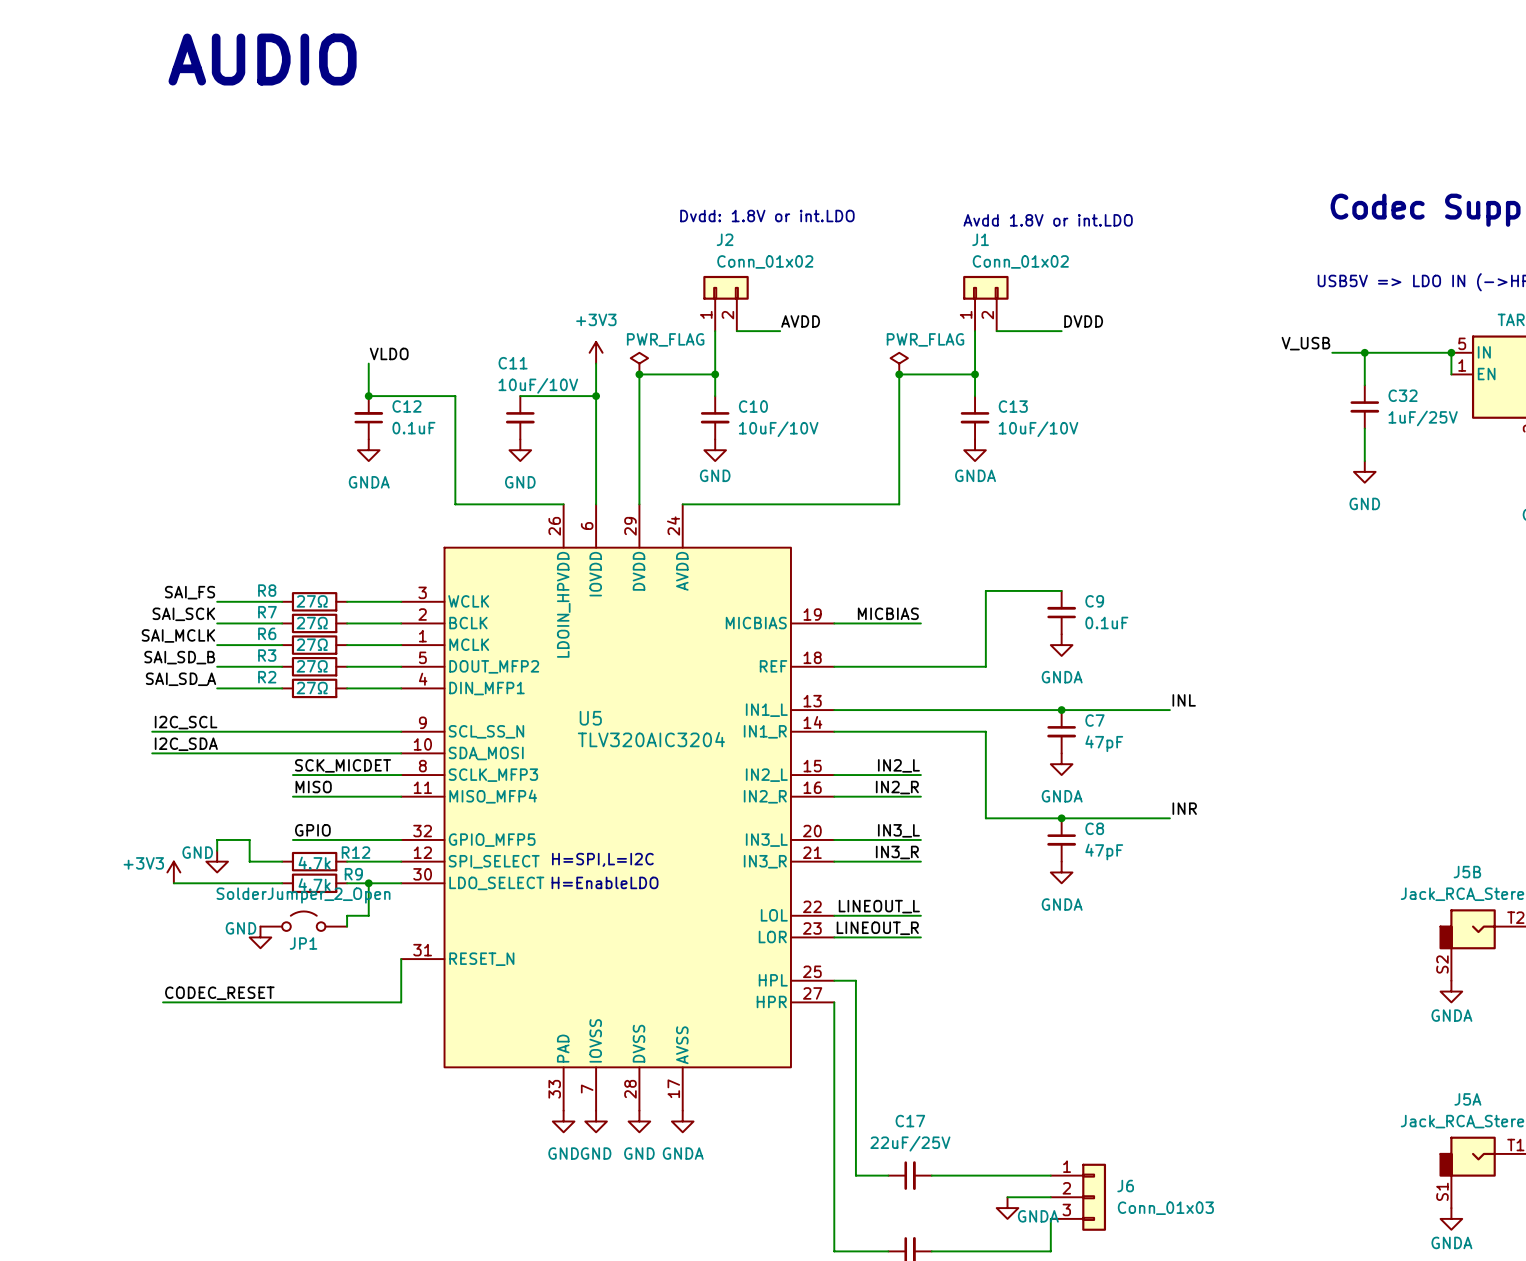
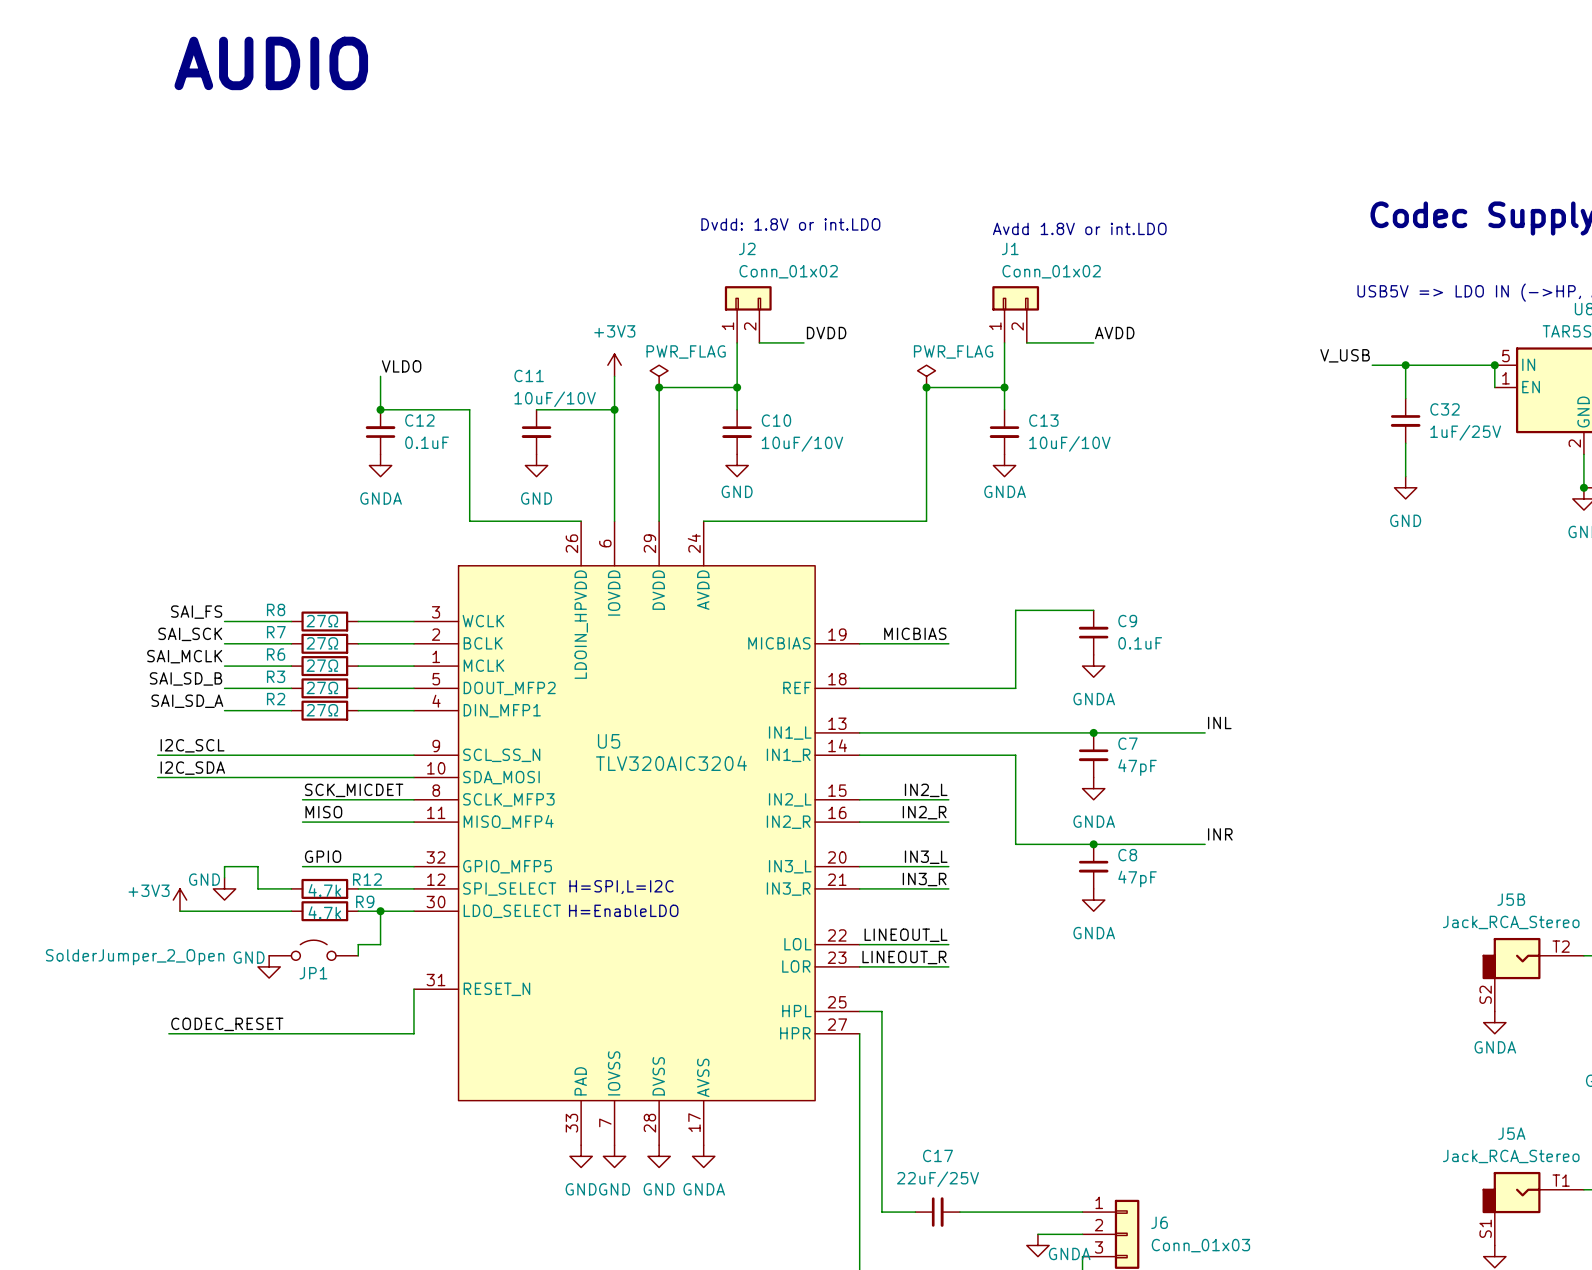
label: AVDD (800, 321) -> DVDD (826, 333)
label: DVDD (1083, 321) -> AVDD (1114, 333)
JP1 value position: SolderJumper_2_Open (303, 895) -> SolderJumper_2_Open (135, 957)

